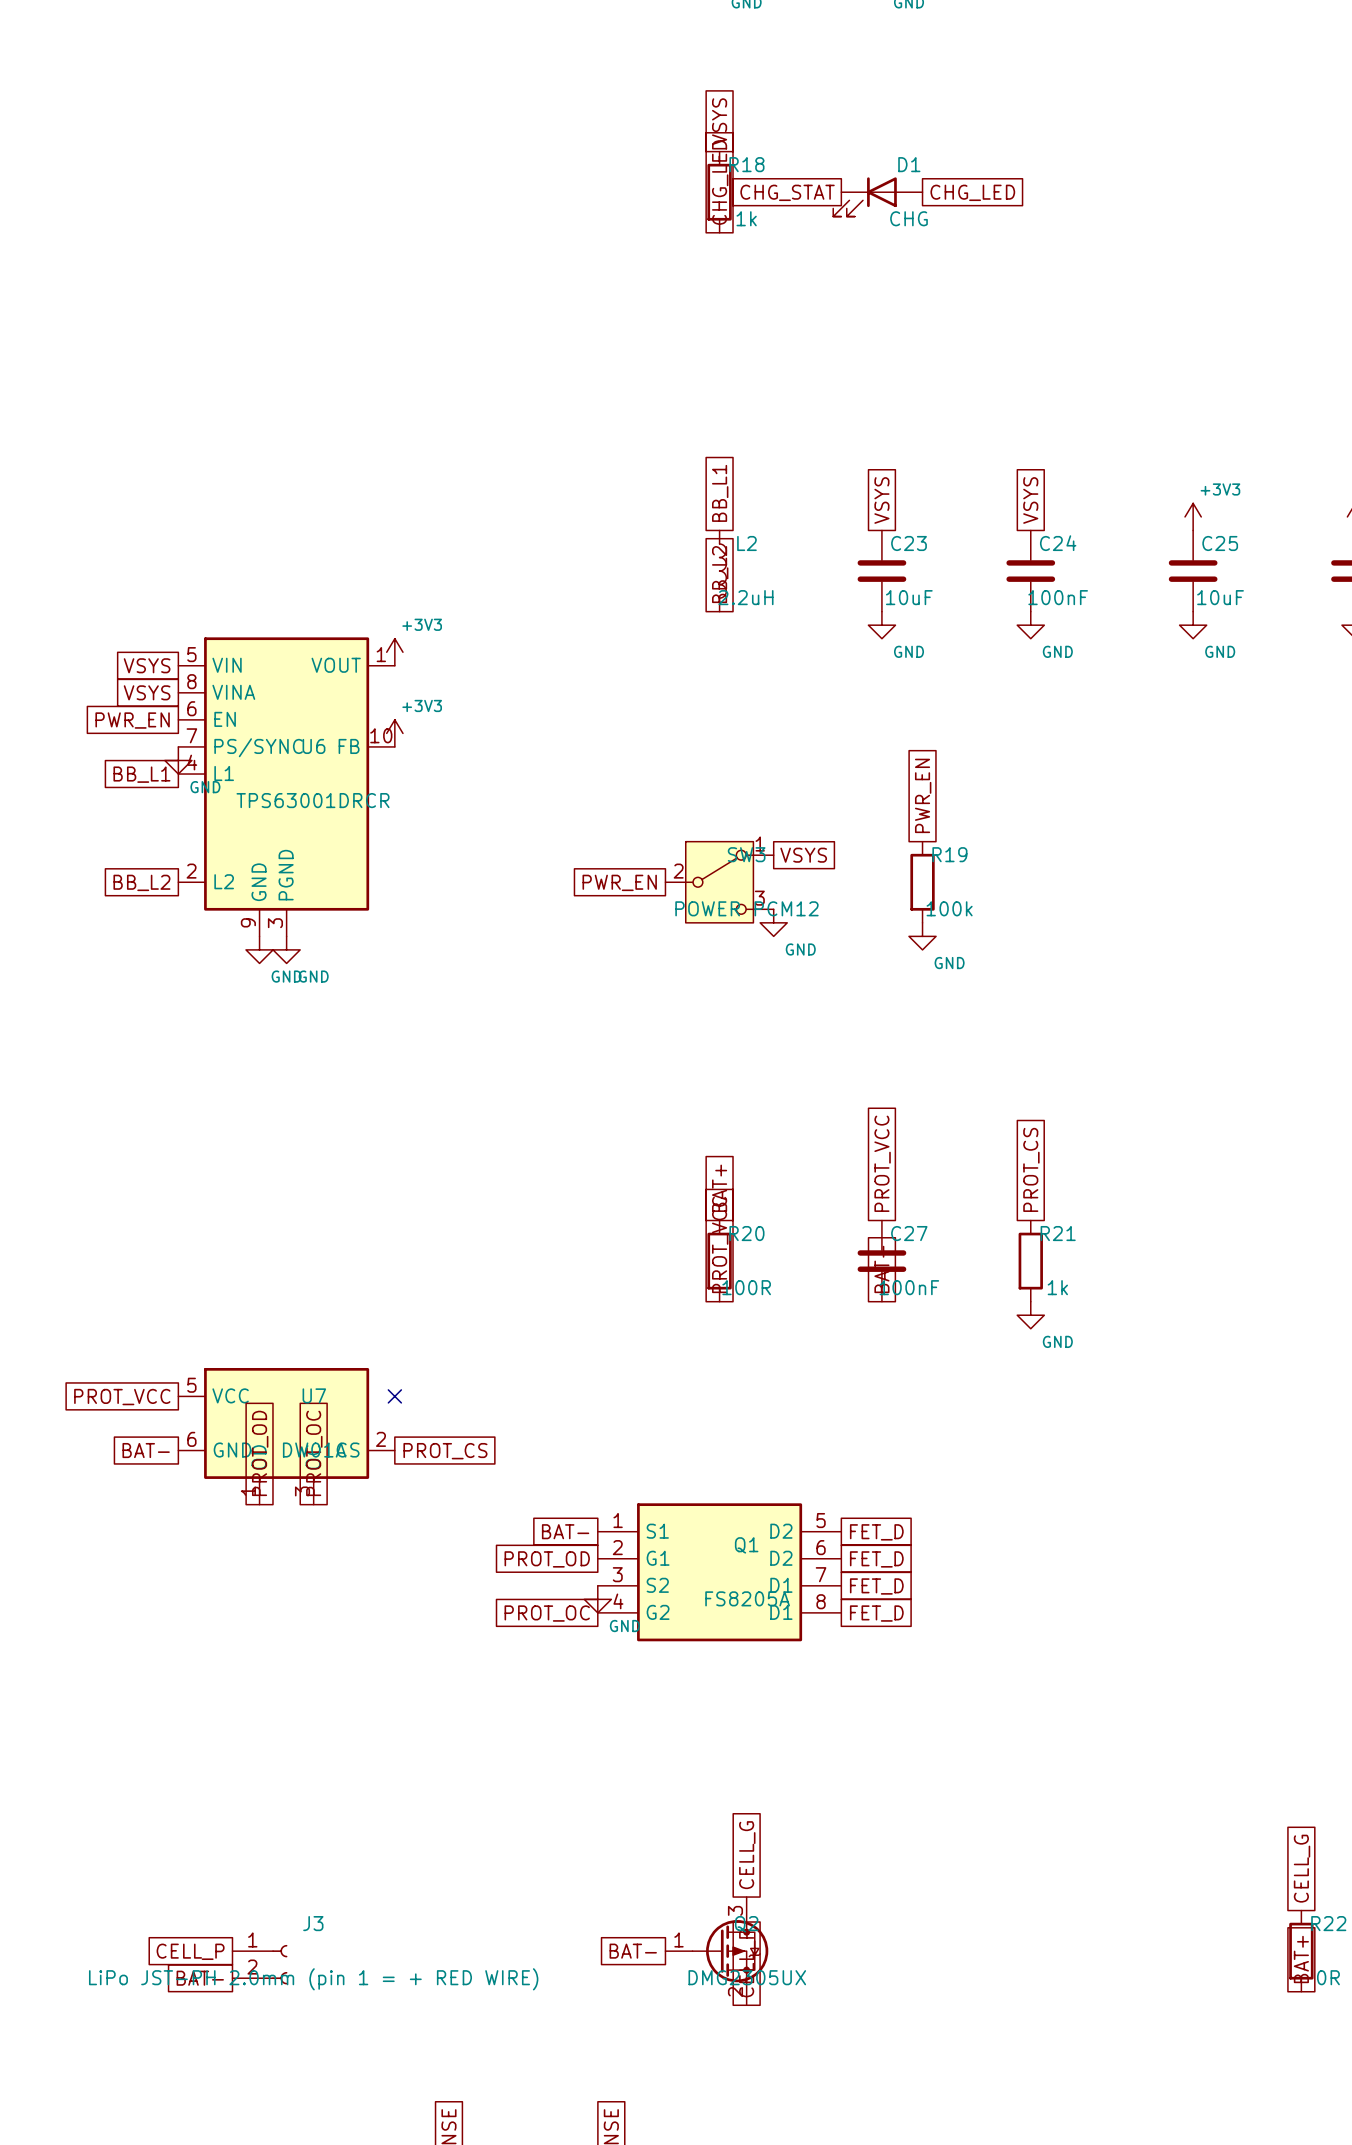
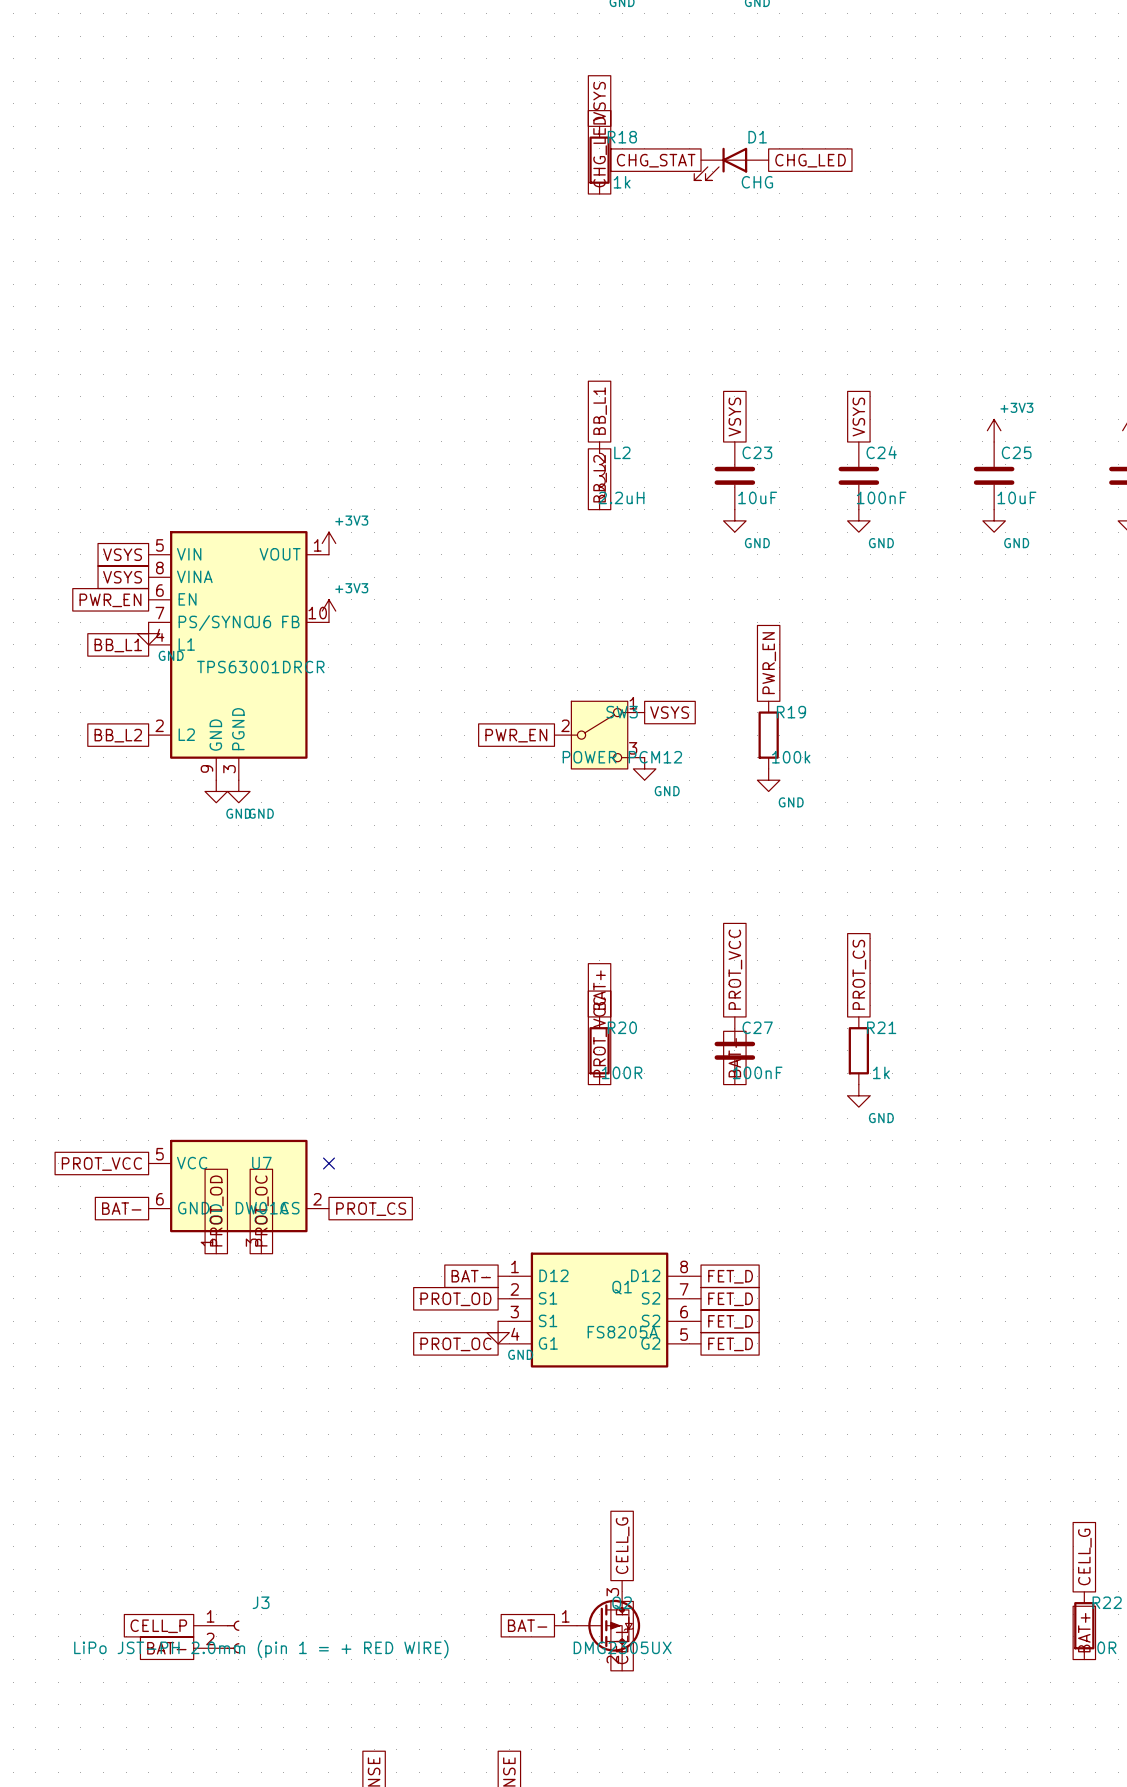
Q1 symbol: [597, 1503, 842, 1642] -> [498, 1252, 702, 1368]

